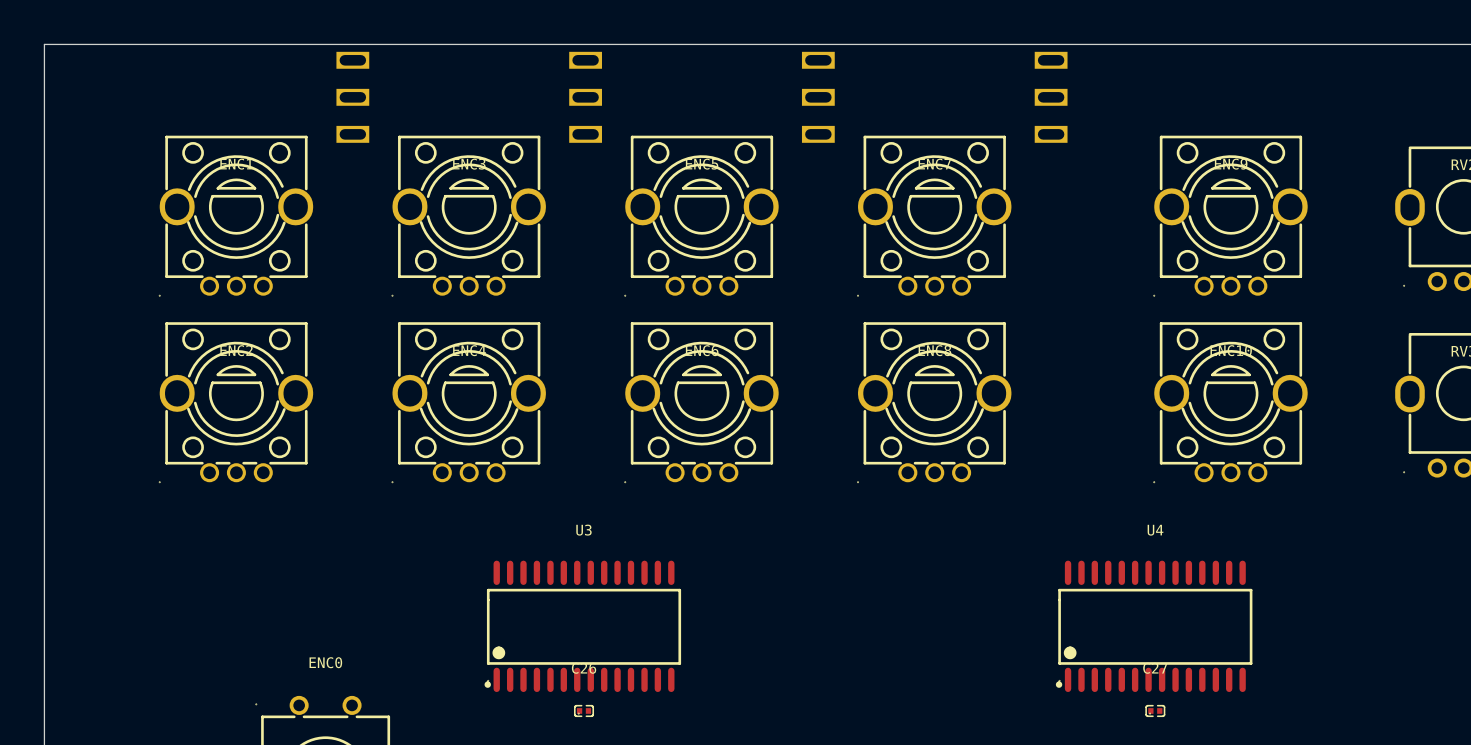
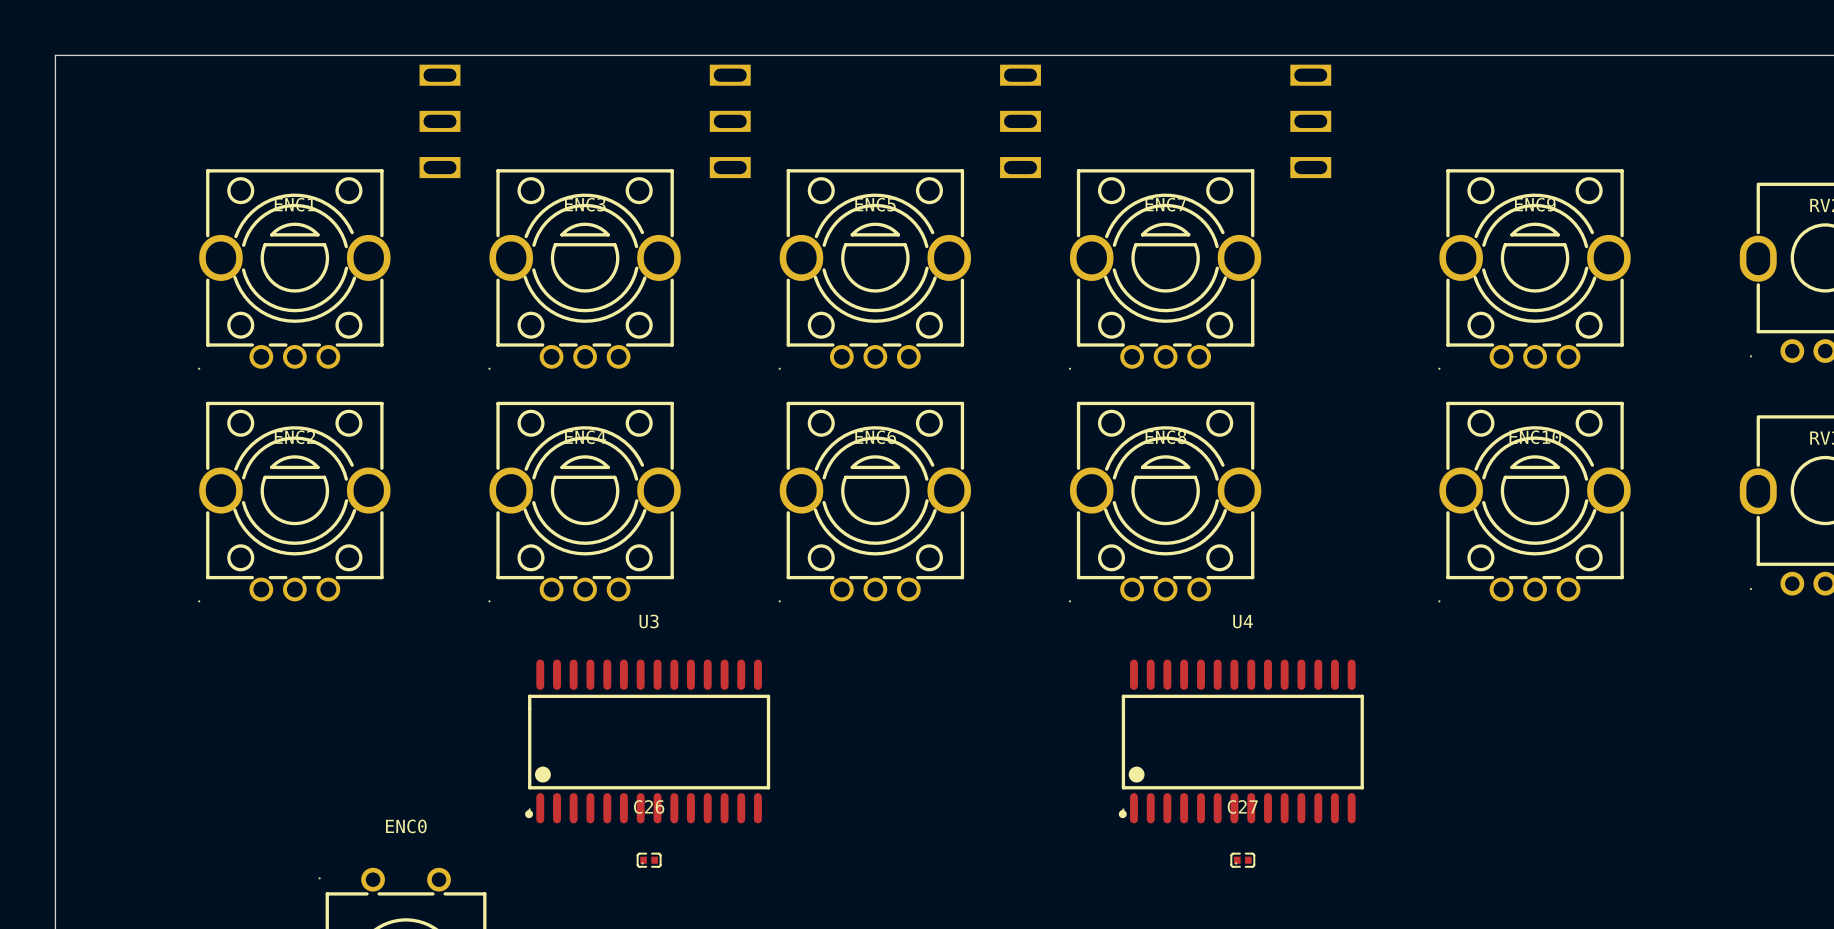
U3 position: (582, 626) -> (647, 741)
U4 position: (1154, 626) -> (1241, 741)
C26 position: (584, 710) -> (649, 860)
C27 position: (1155, 710) -> (1242, 860)

